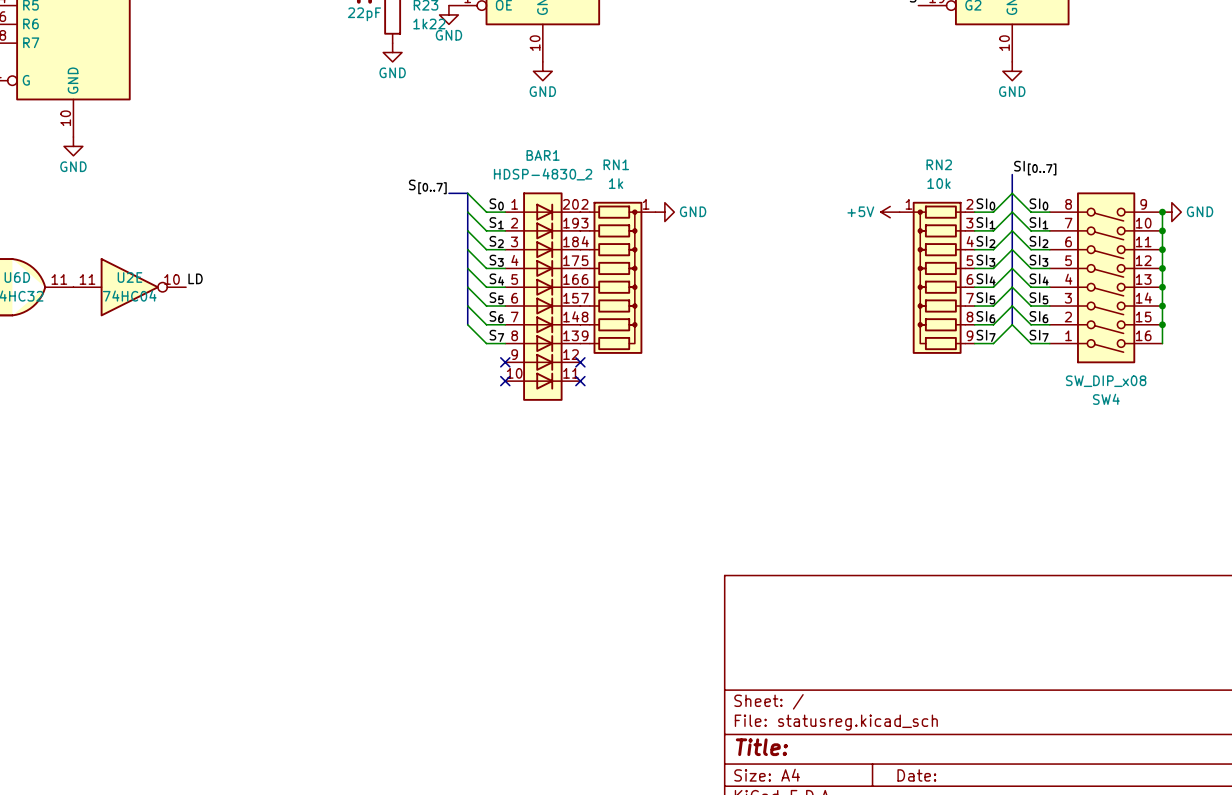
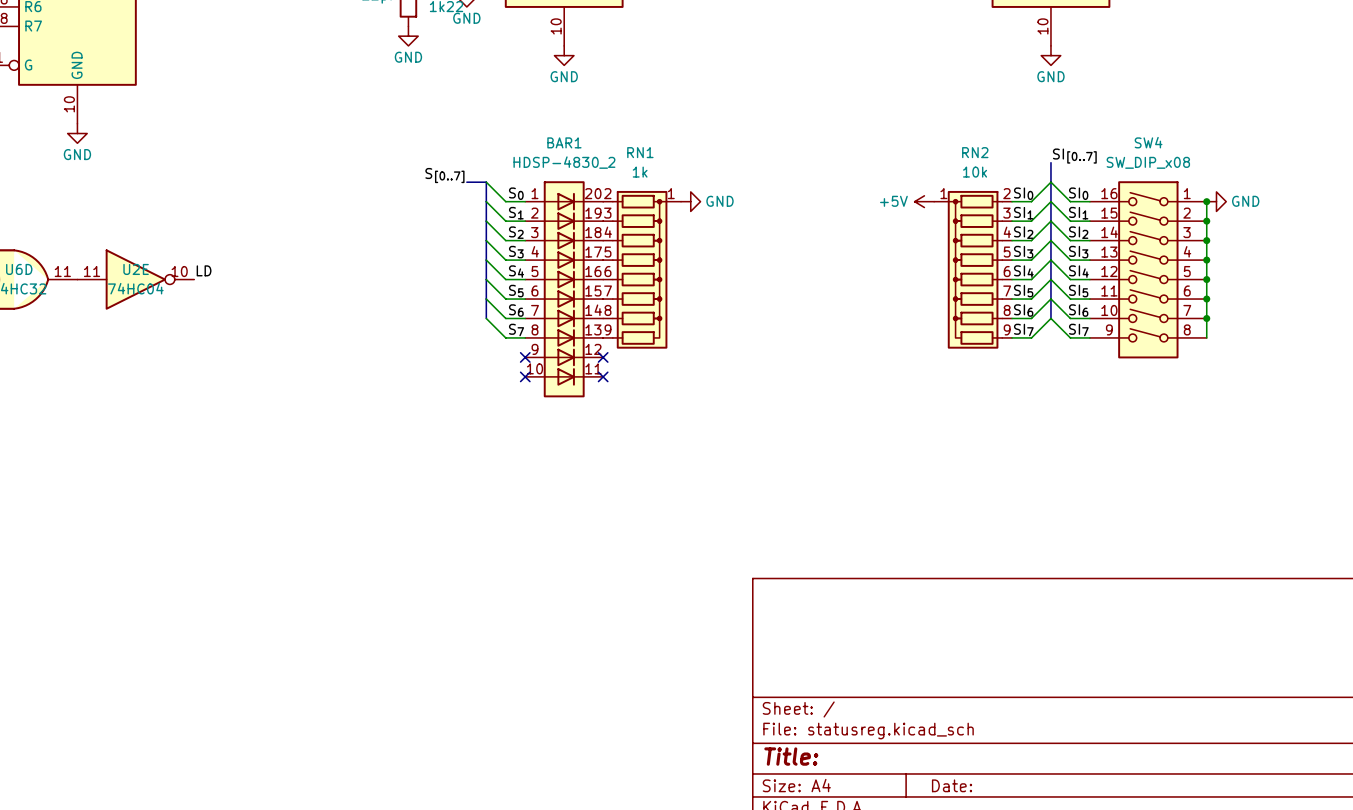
SW4 rotation: 0° (1106, 277) -> 180° (1148, 269)

